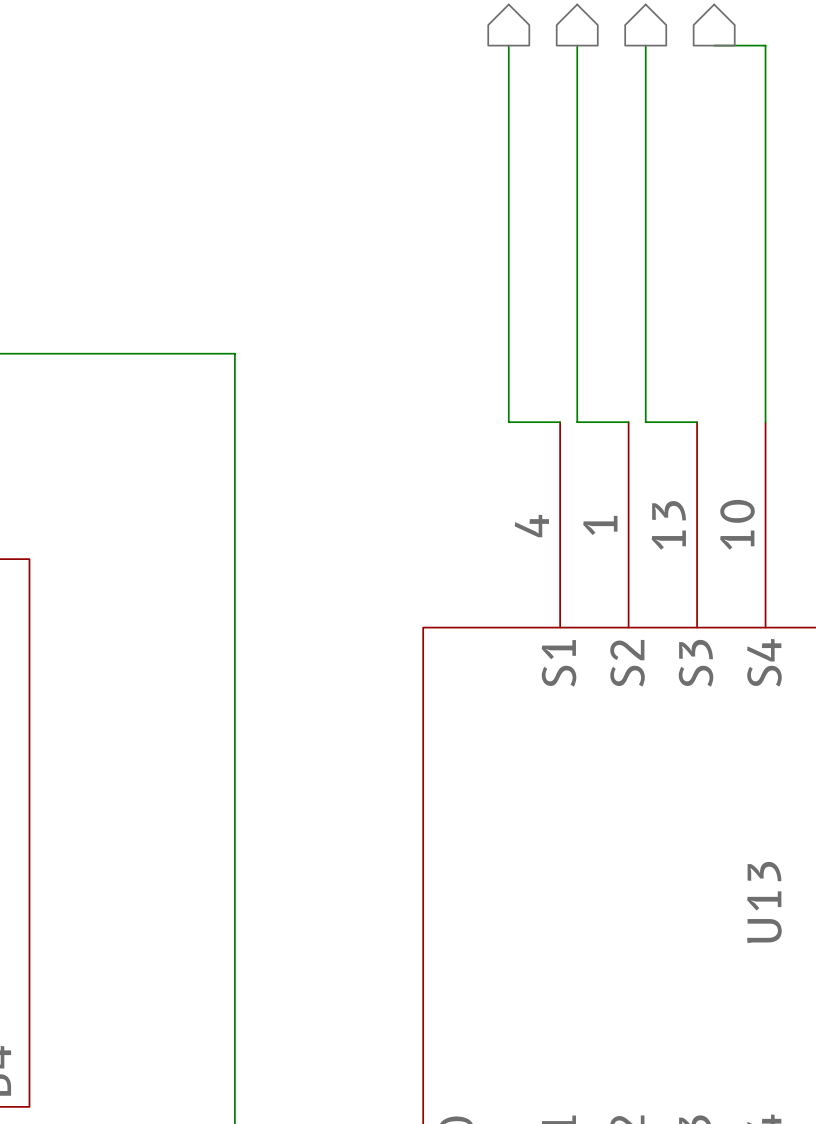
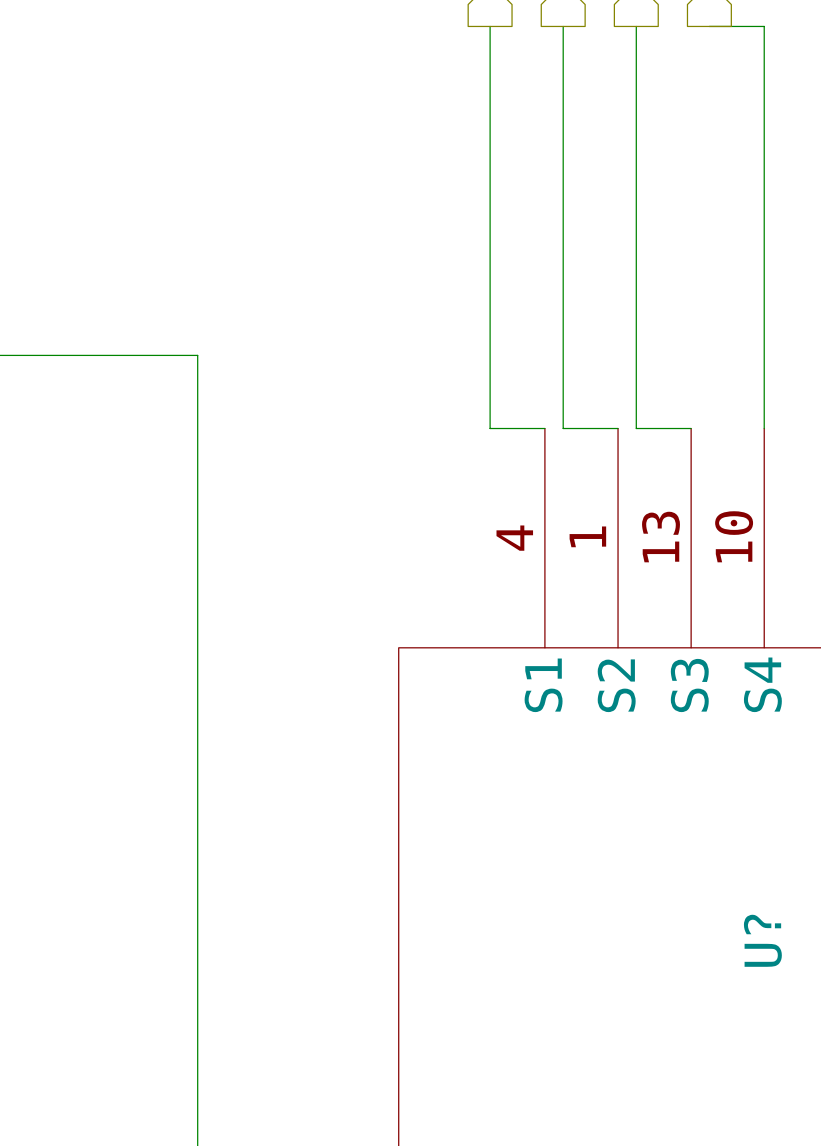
U13 name: U13 (764, 902) -> U? (762, 940)

